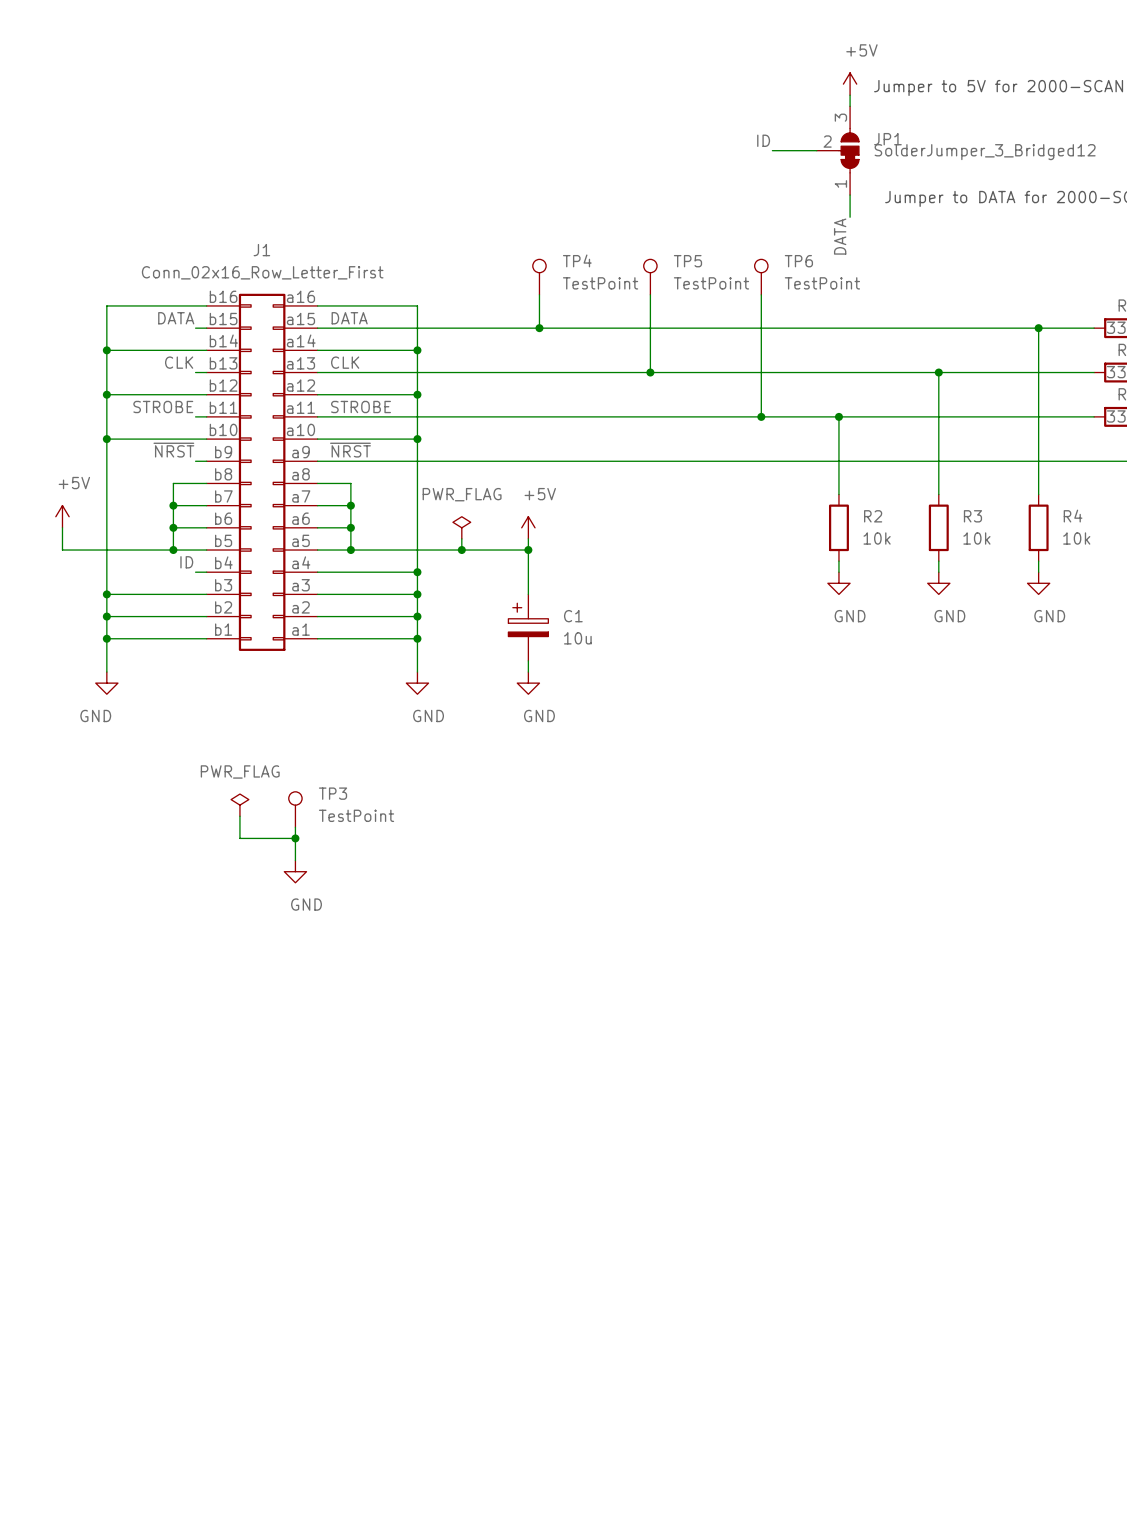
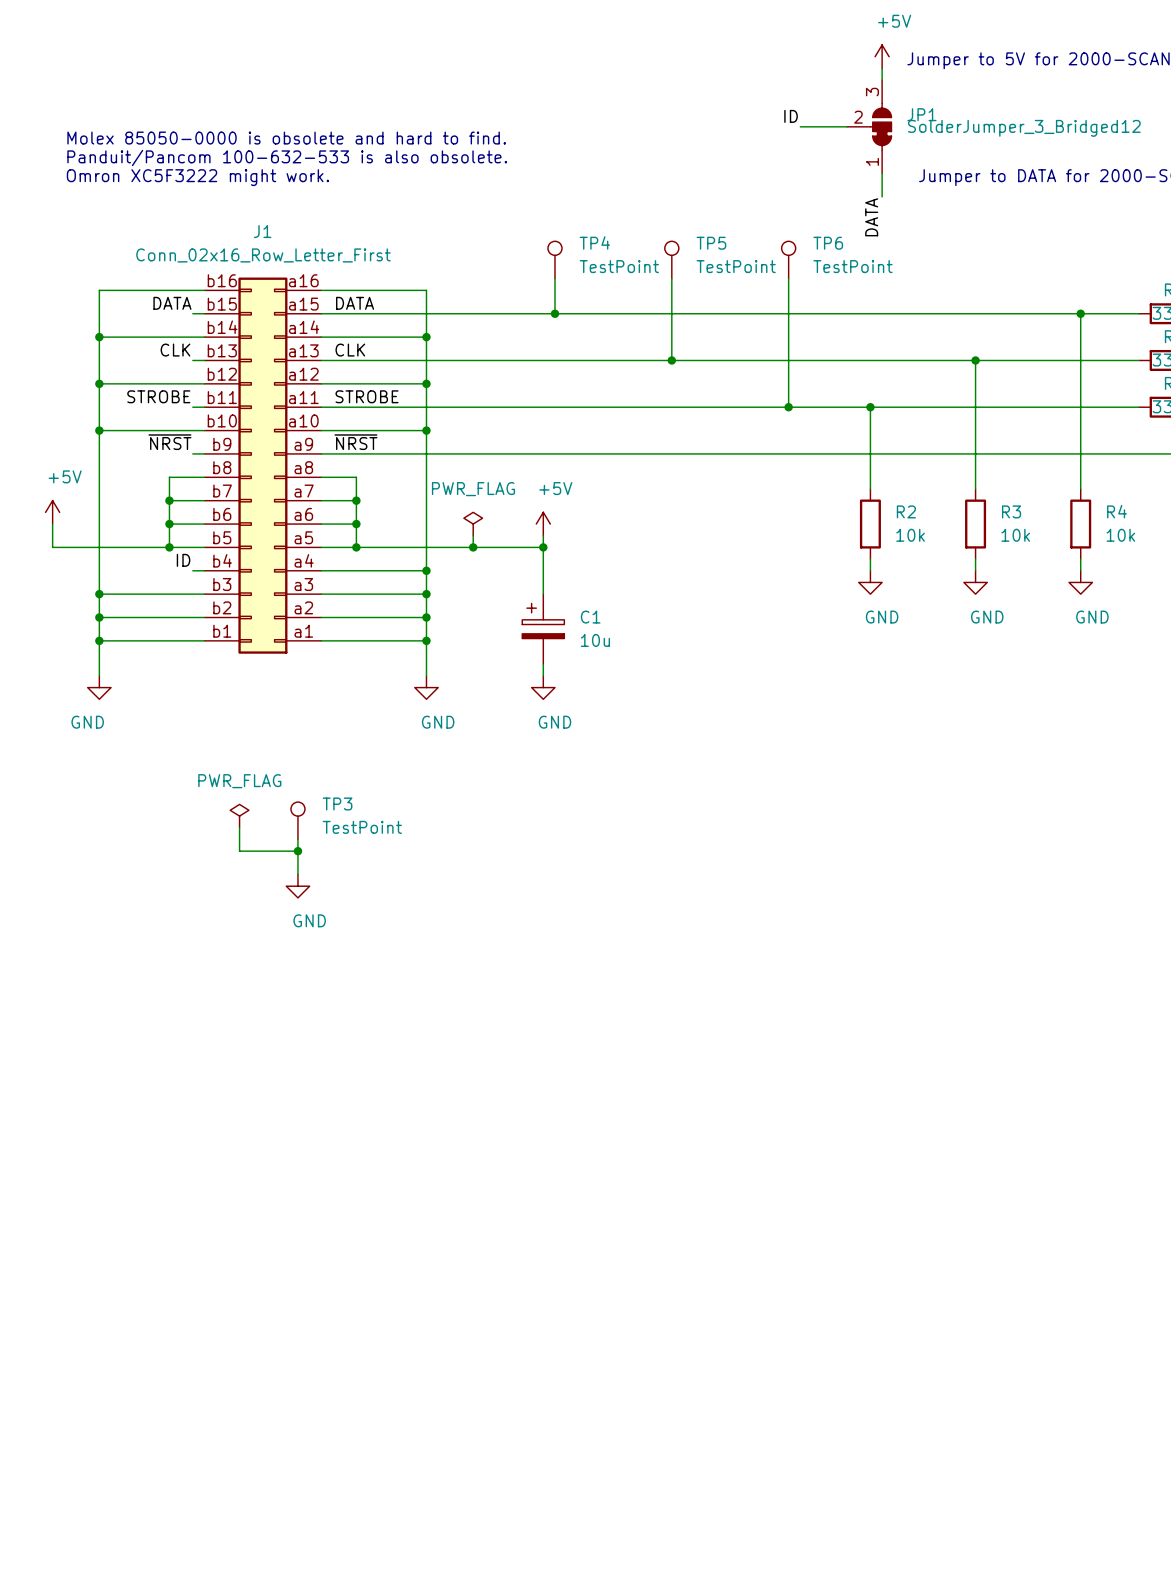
text: none -> Molex 85050-0000 is obsolete and hard to find. (286, 138)
text: none -> Panduit/Pancom 100-632-533 is also obsolete. (287, 157)
text: none -> Omron XC5F3222 might work. (197, 177)

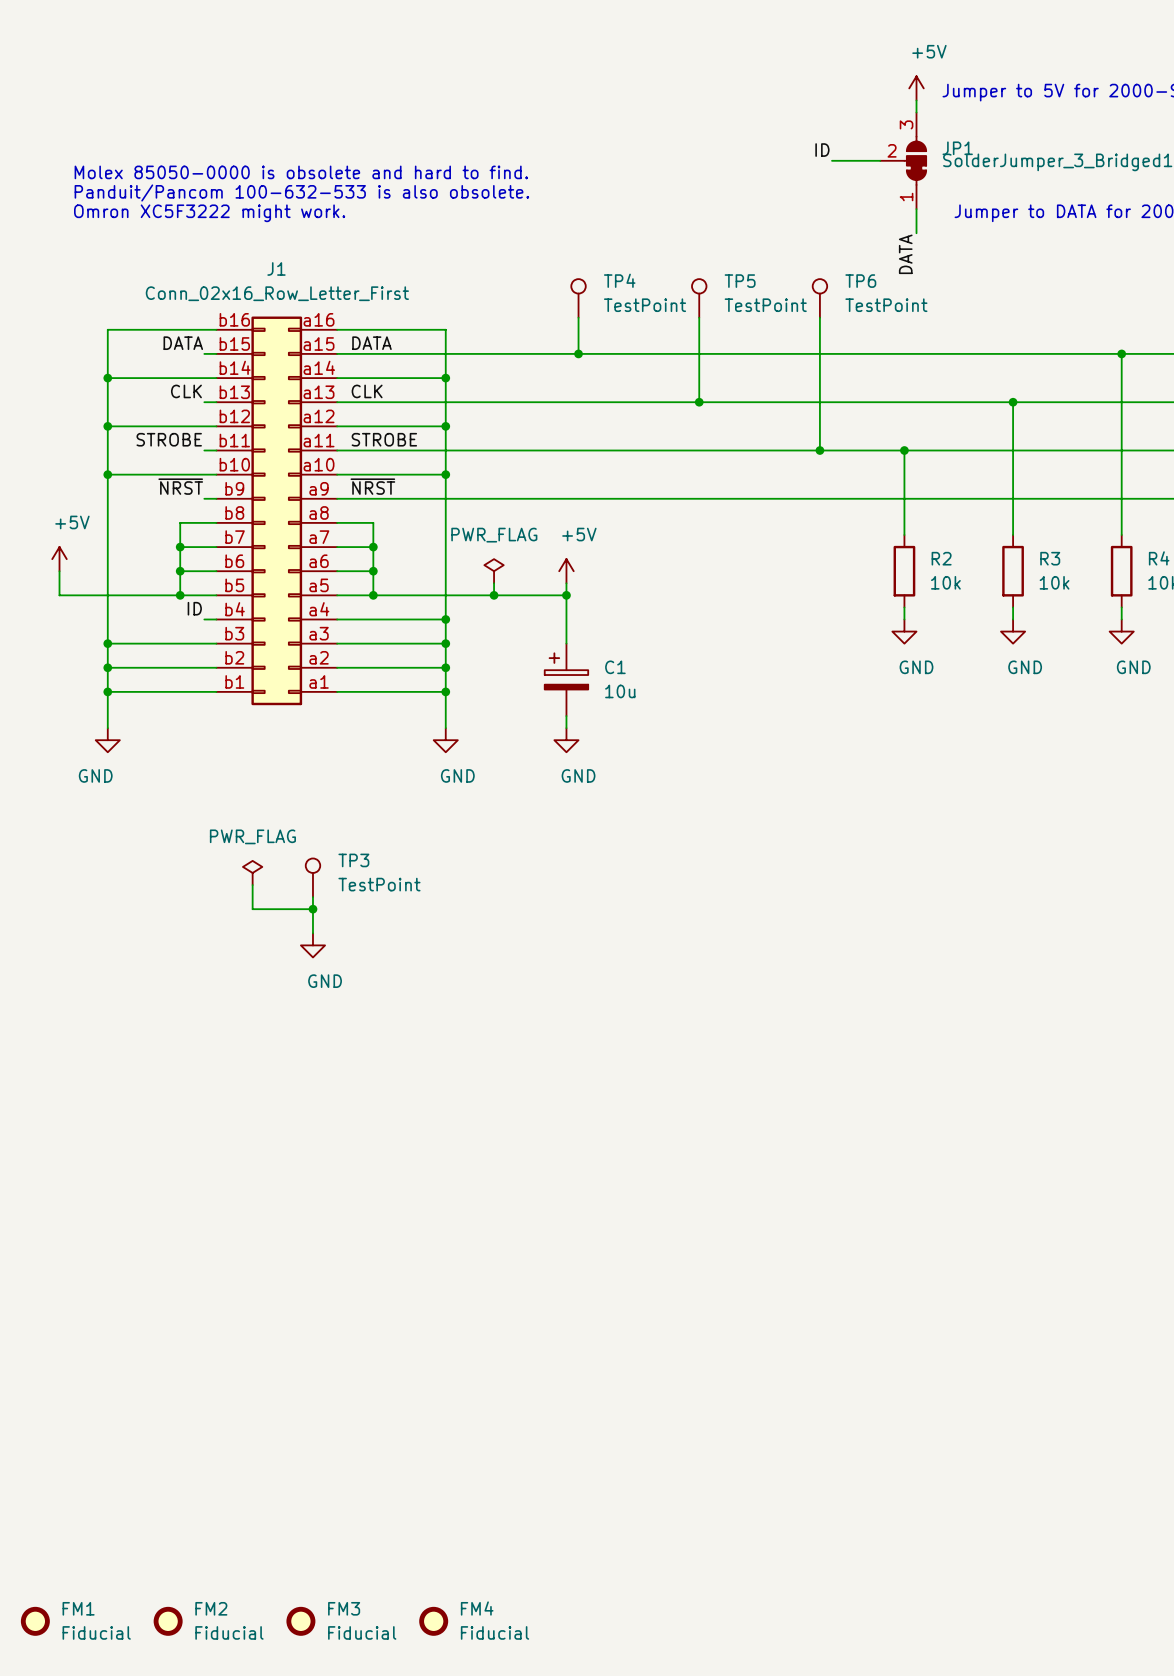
FM1: none -> Fiducial (35, 1621)
FM2: none -> Fiducial (168, 1621)
FM3: none -> Fiducial (300, 1621)
FM4: none -> Fiducial (433, 1621)

